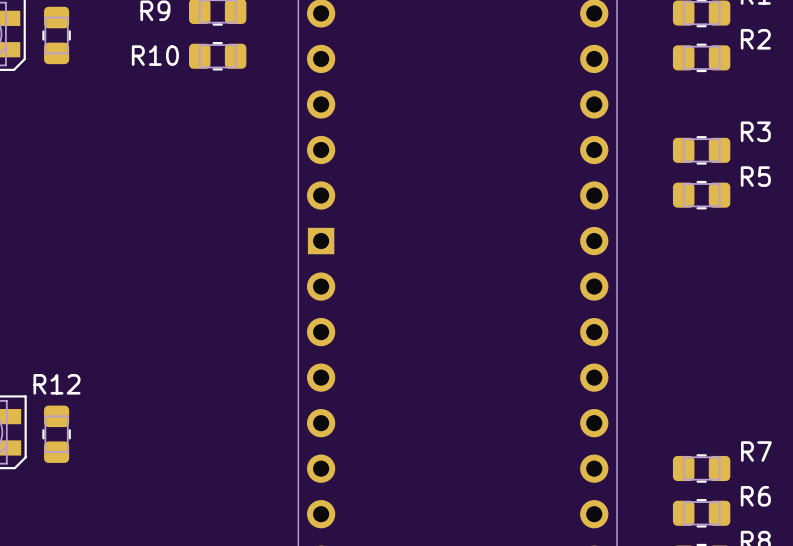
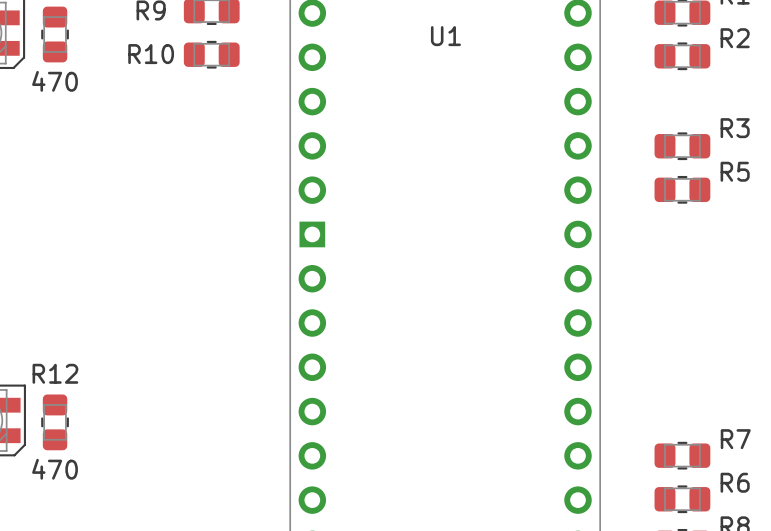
U1 name: none -> U1 (445, 36)
part value: none -> 470 (55, 81)
R12 value: none -> 470 (55, 469)

